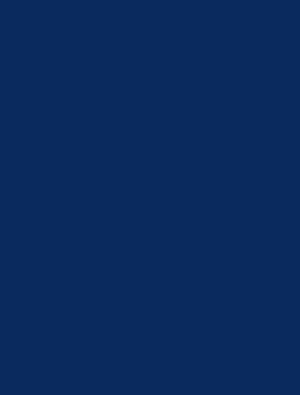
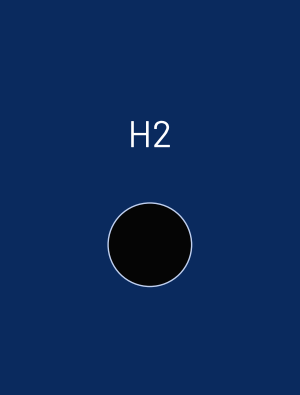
H2: none -> (149, 244)

